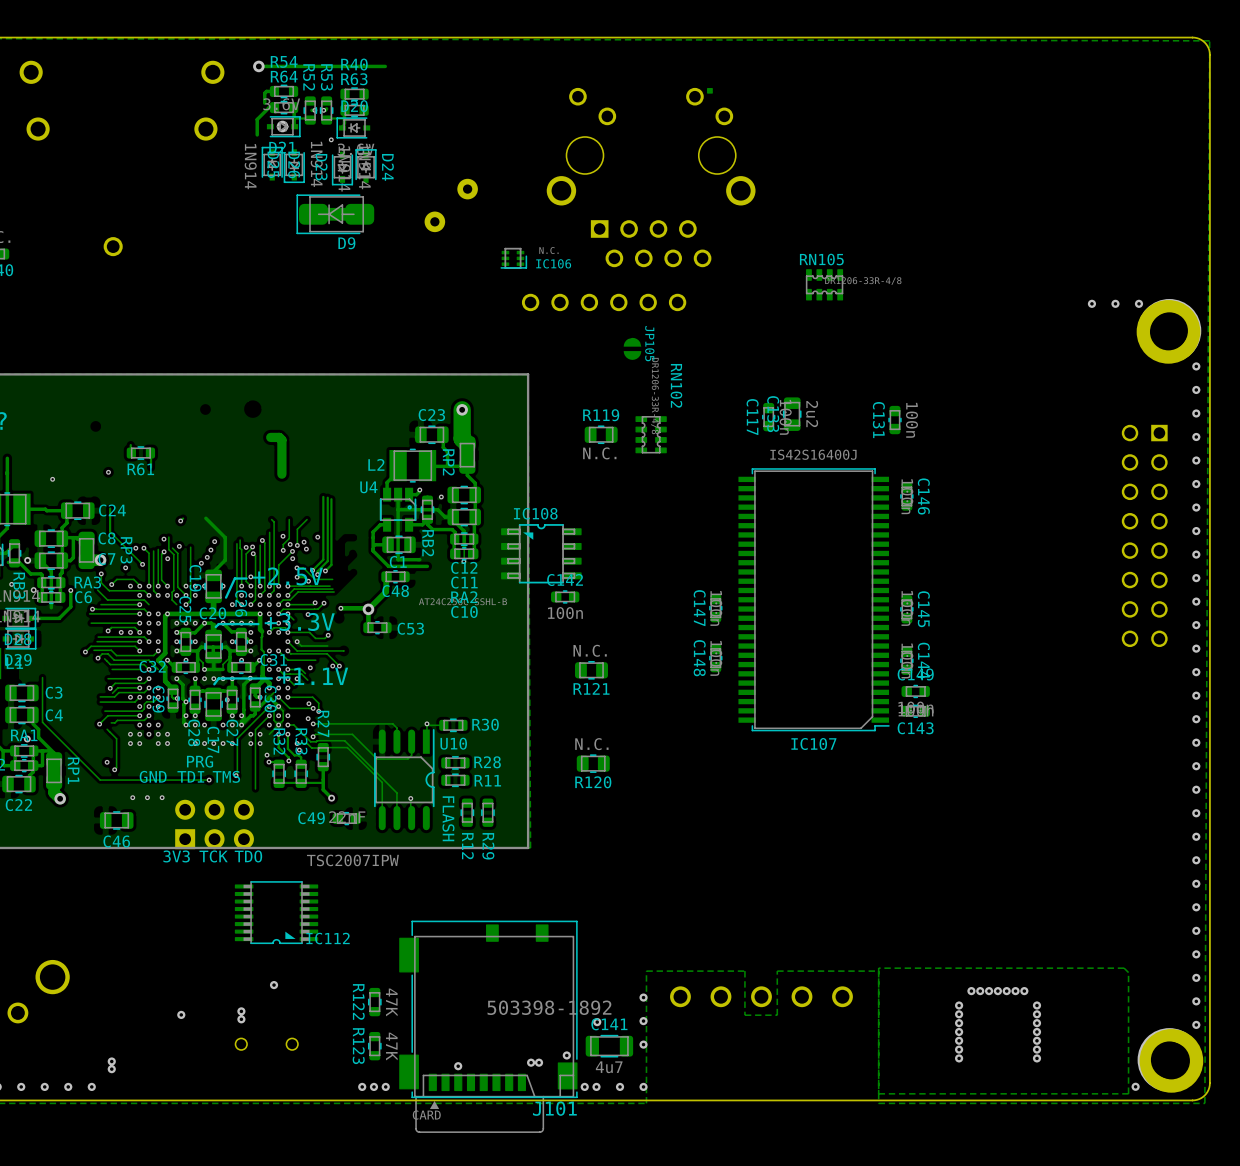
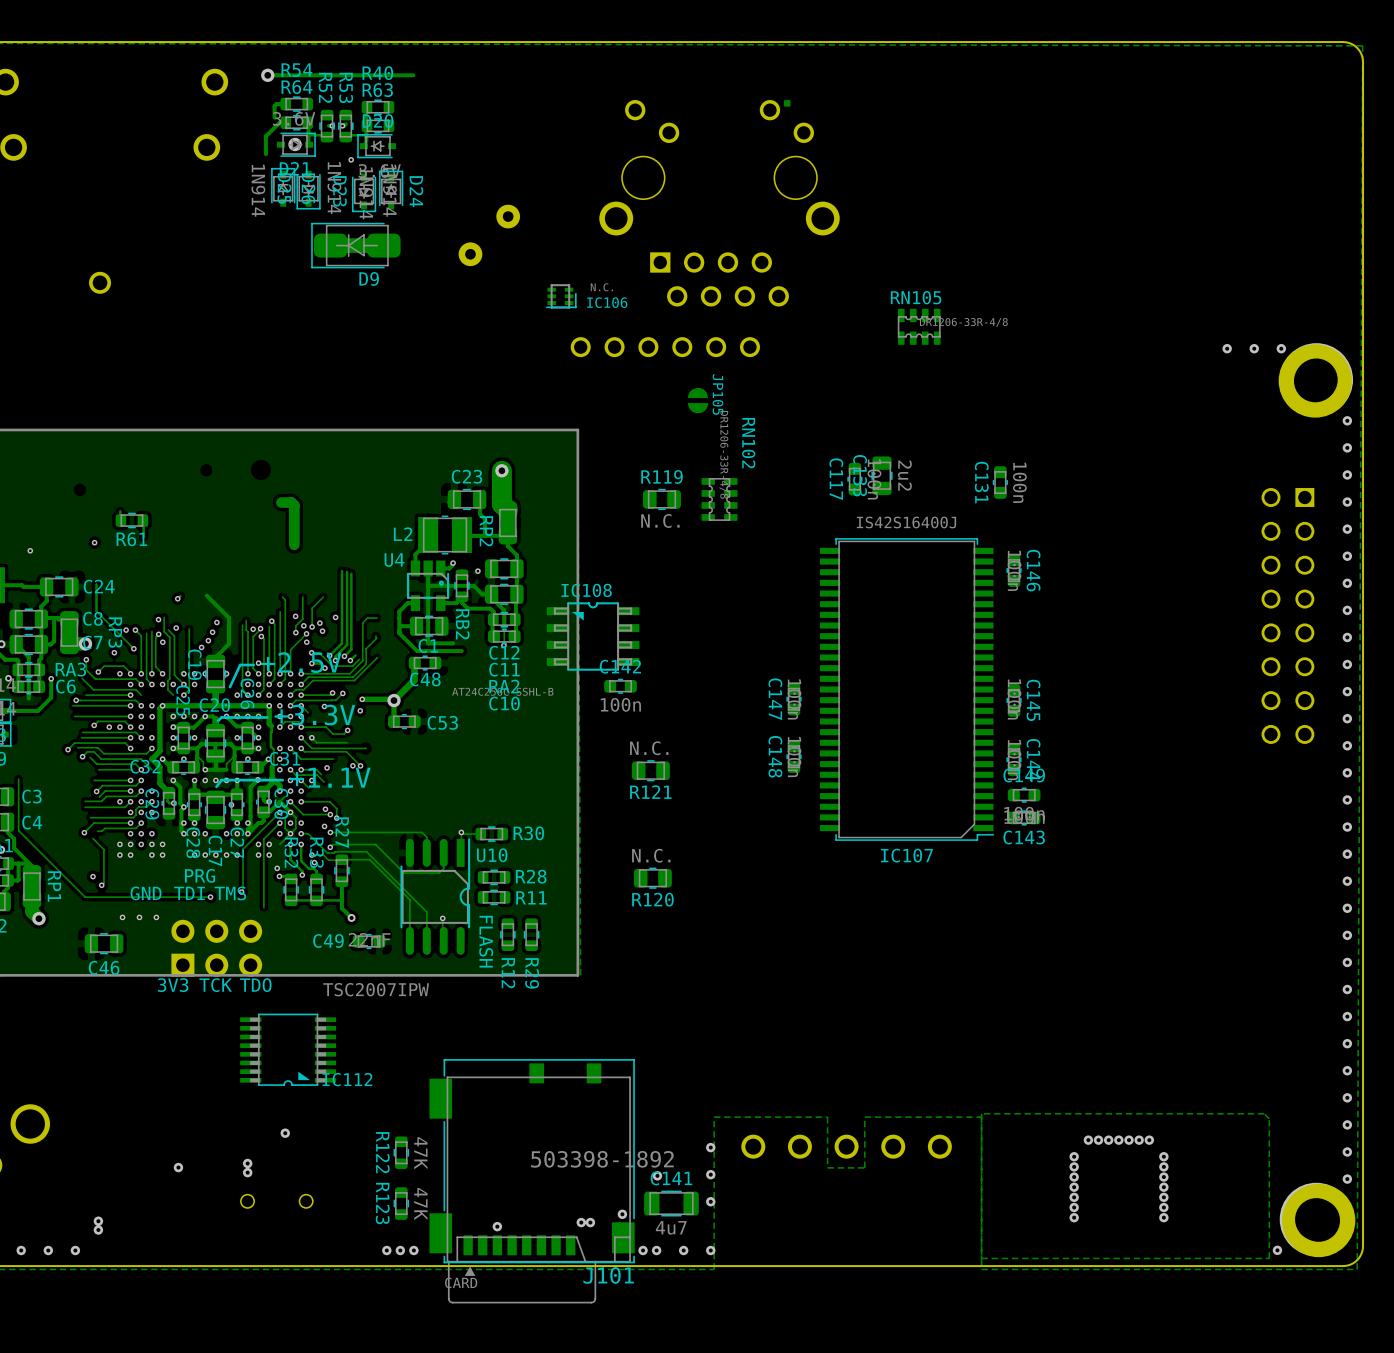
track: none -> (376, 618) (367, 618) (362, 622) (362, 660) (349, 673)
track: none -> (375, 636) (375, 638)
track: none -> (376, 638) (366, 648) (366, 664) (353, 677)
track: none -> (355, 655) (350, 660)
track: none -> (376, 658) (354, 680)
track: none -> (359, 659) (352, 666)
via: none -> (350, 660)
via: none -> (360, 710)

